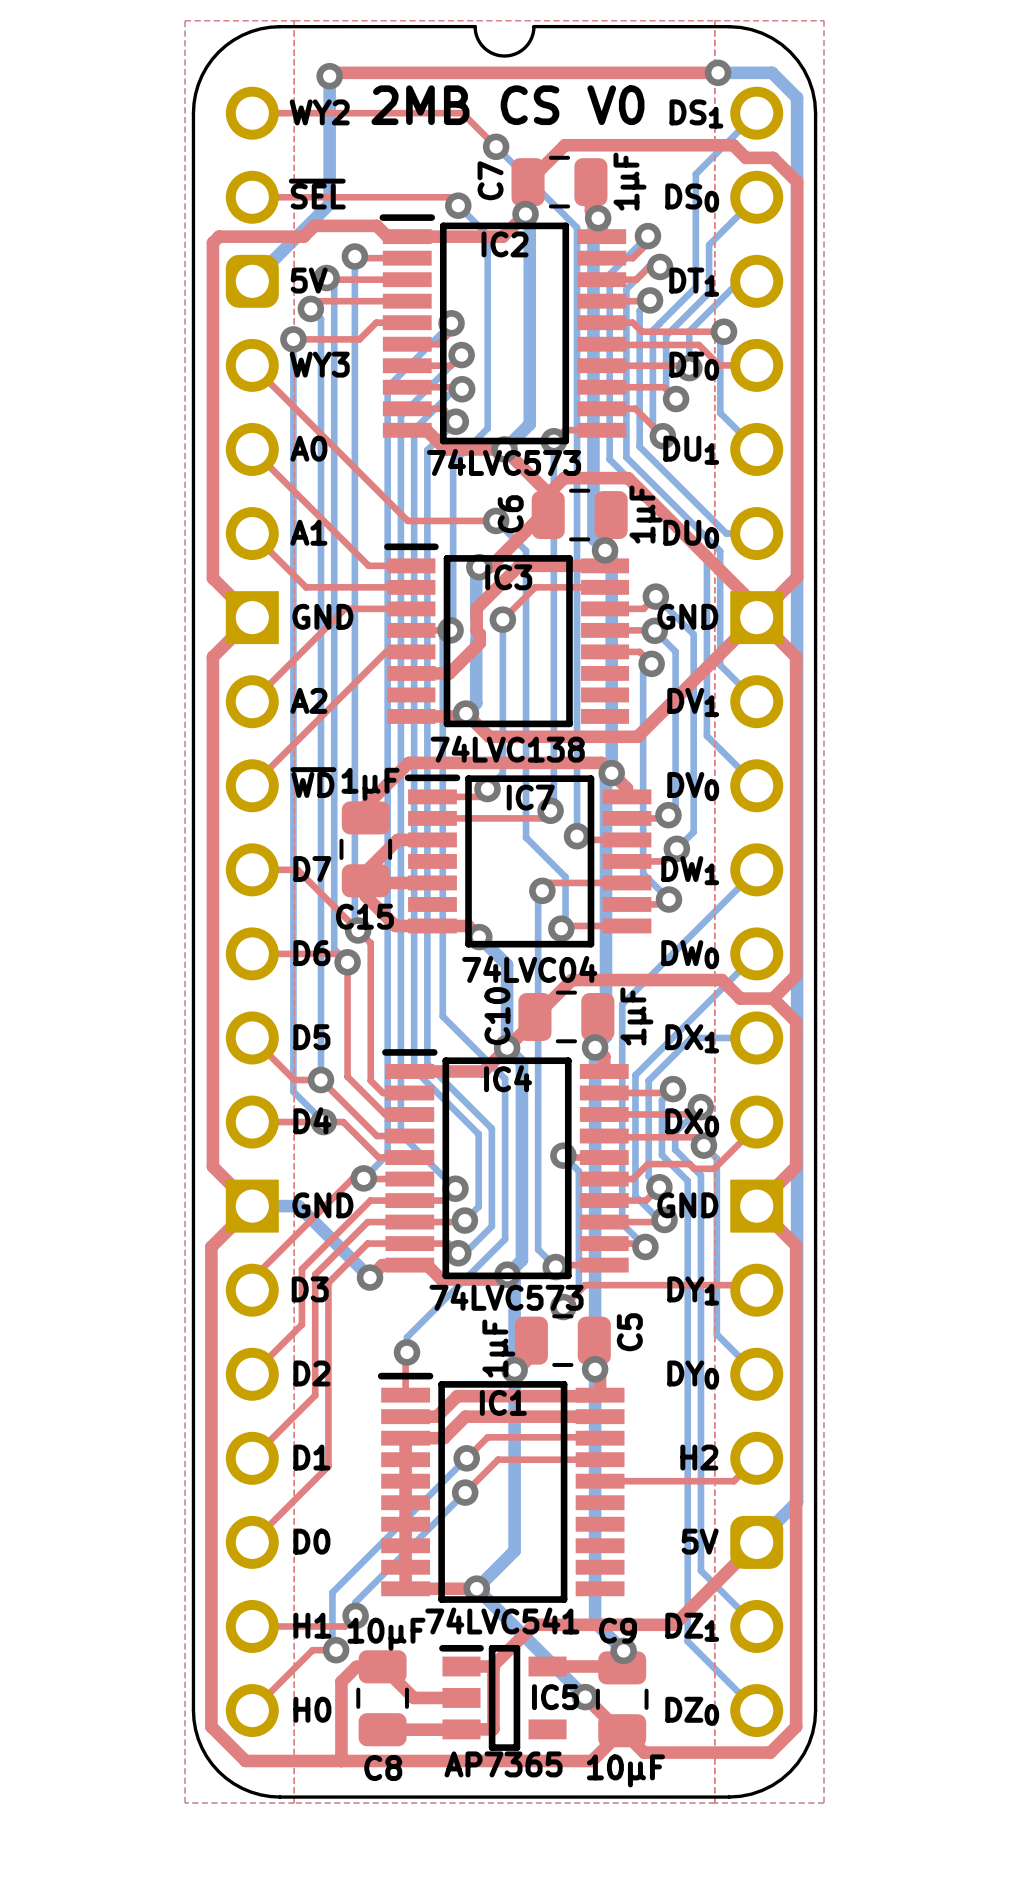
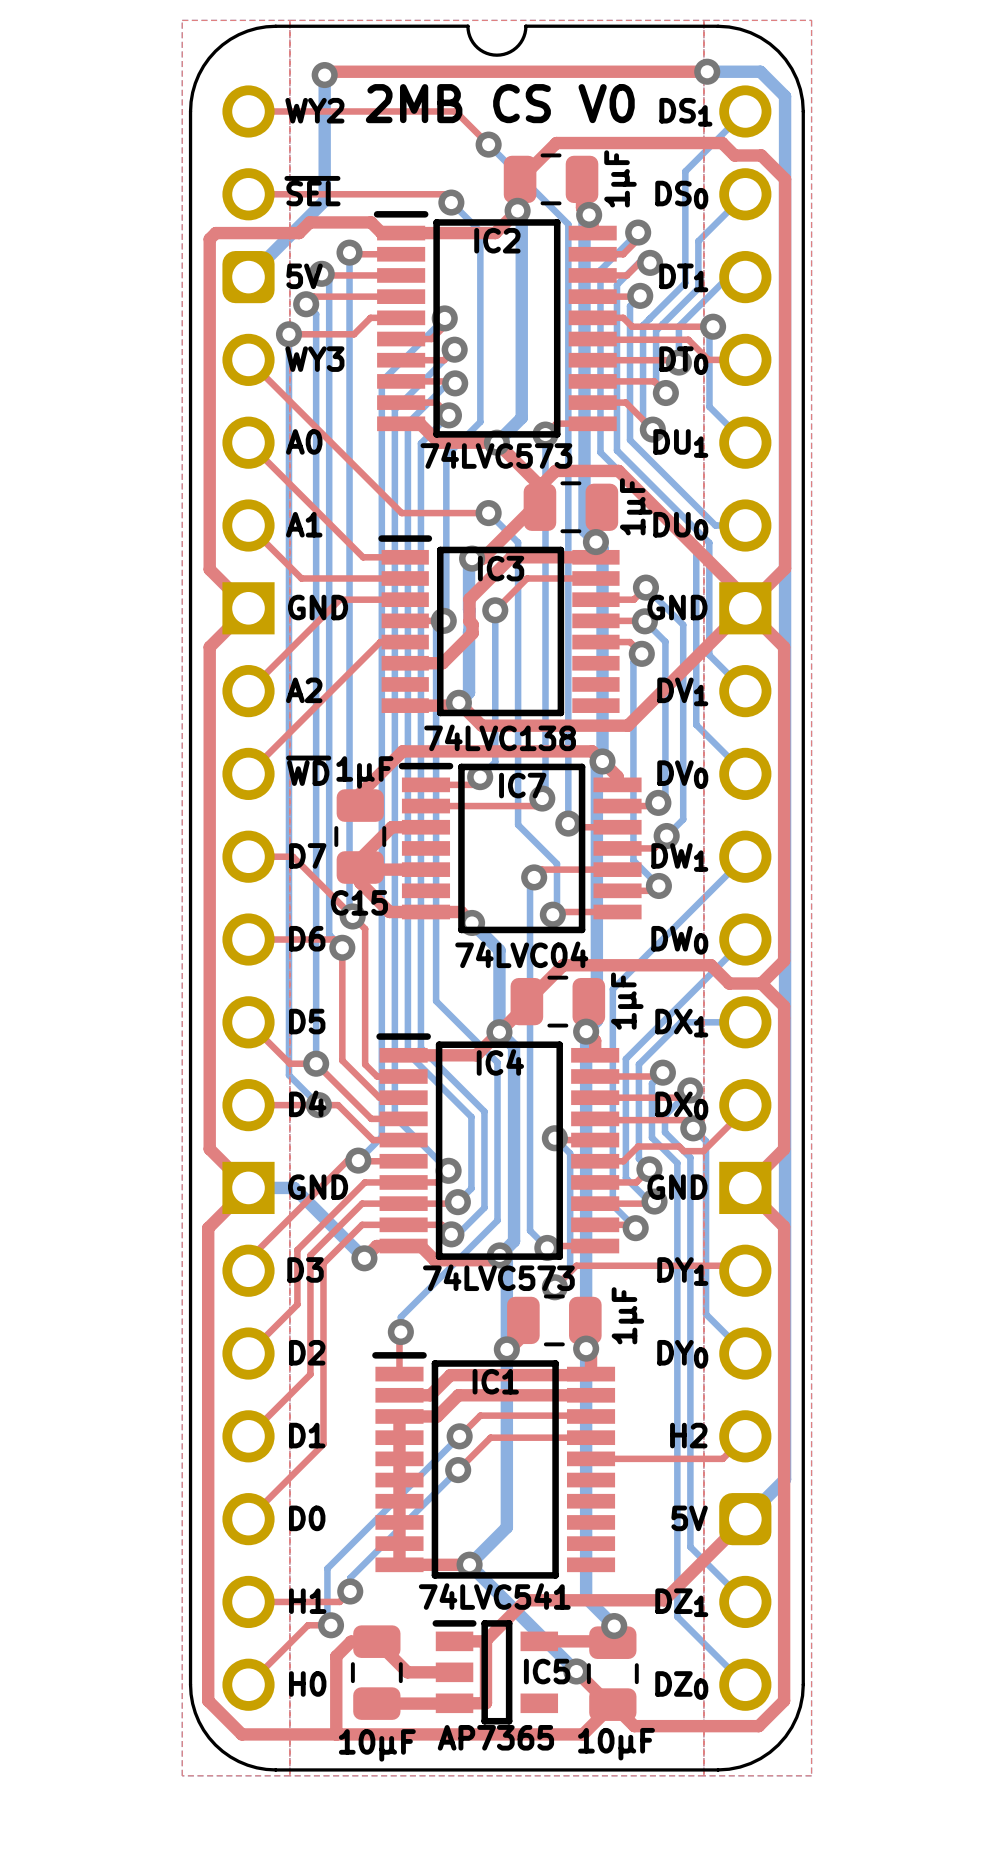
C7 name: C7 (490, 180) -> none
C6 name: C6 (510, 514) -> none
C10 name: C10 (497, 1016) -> none
C5 name: C5 (629, 1332) -> none
C5 value position: 1μF (498, 1348) -> 1μF (627, 1315)
C9 name: C9 (618, 1630) -> none
C8 value position: 10µF (386, 1634) -> 10µF (377, 1745)
C8 name: C8 (383, 1768) -> none

